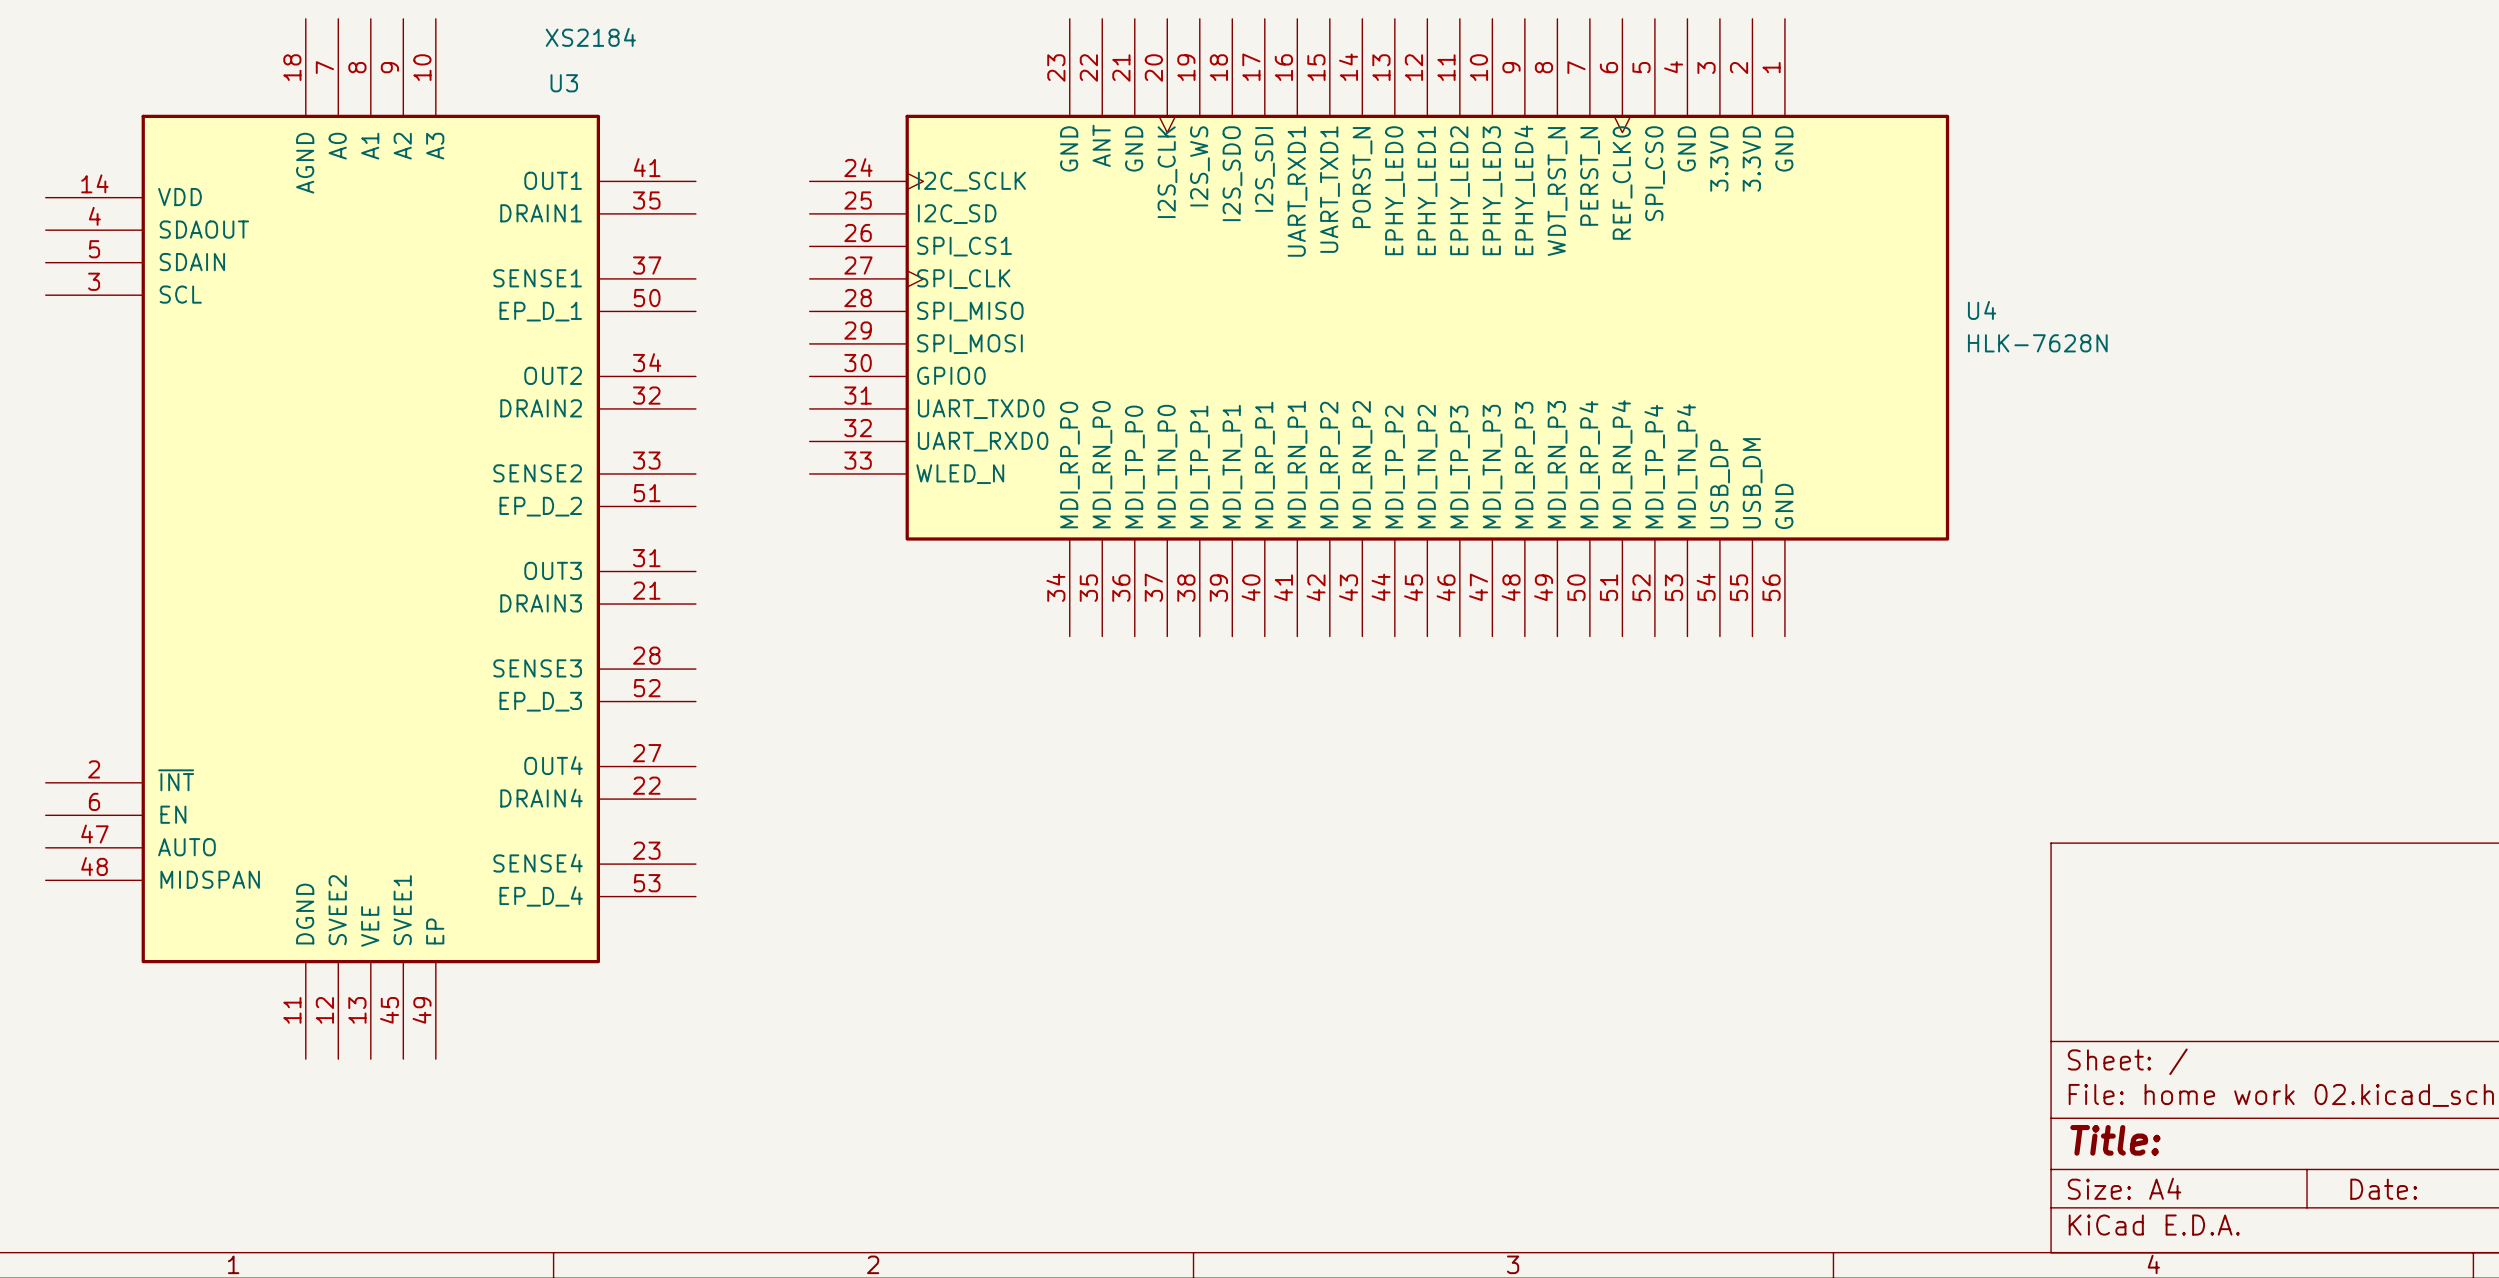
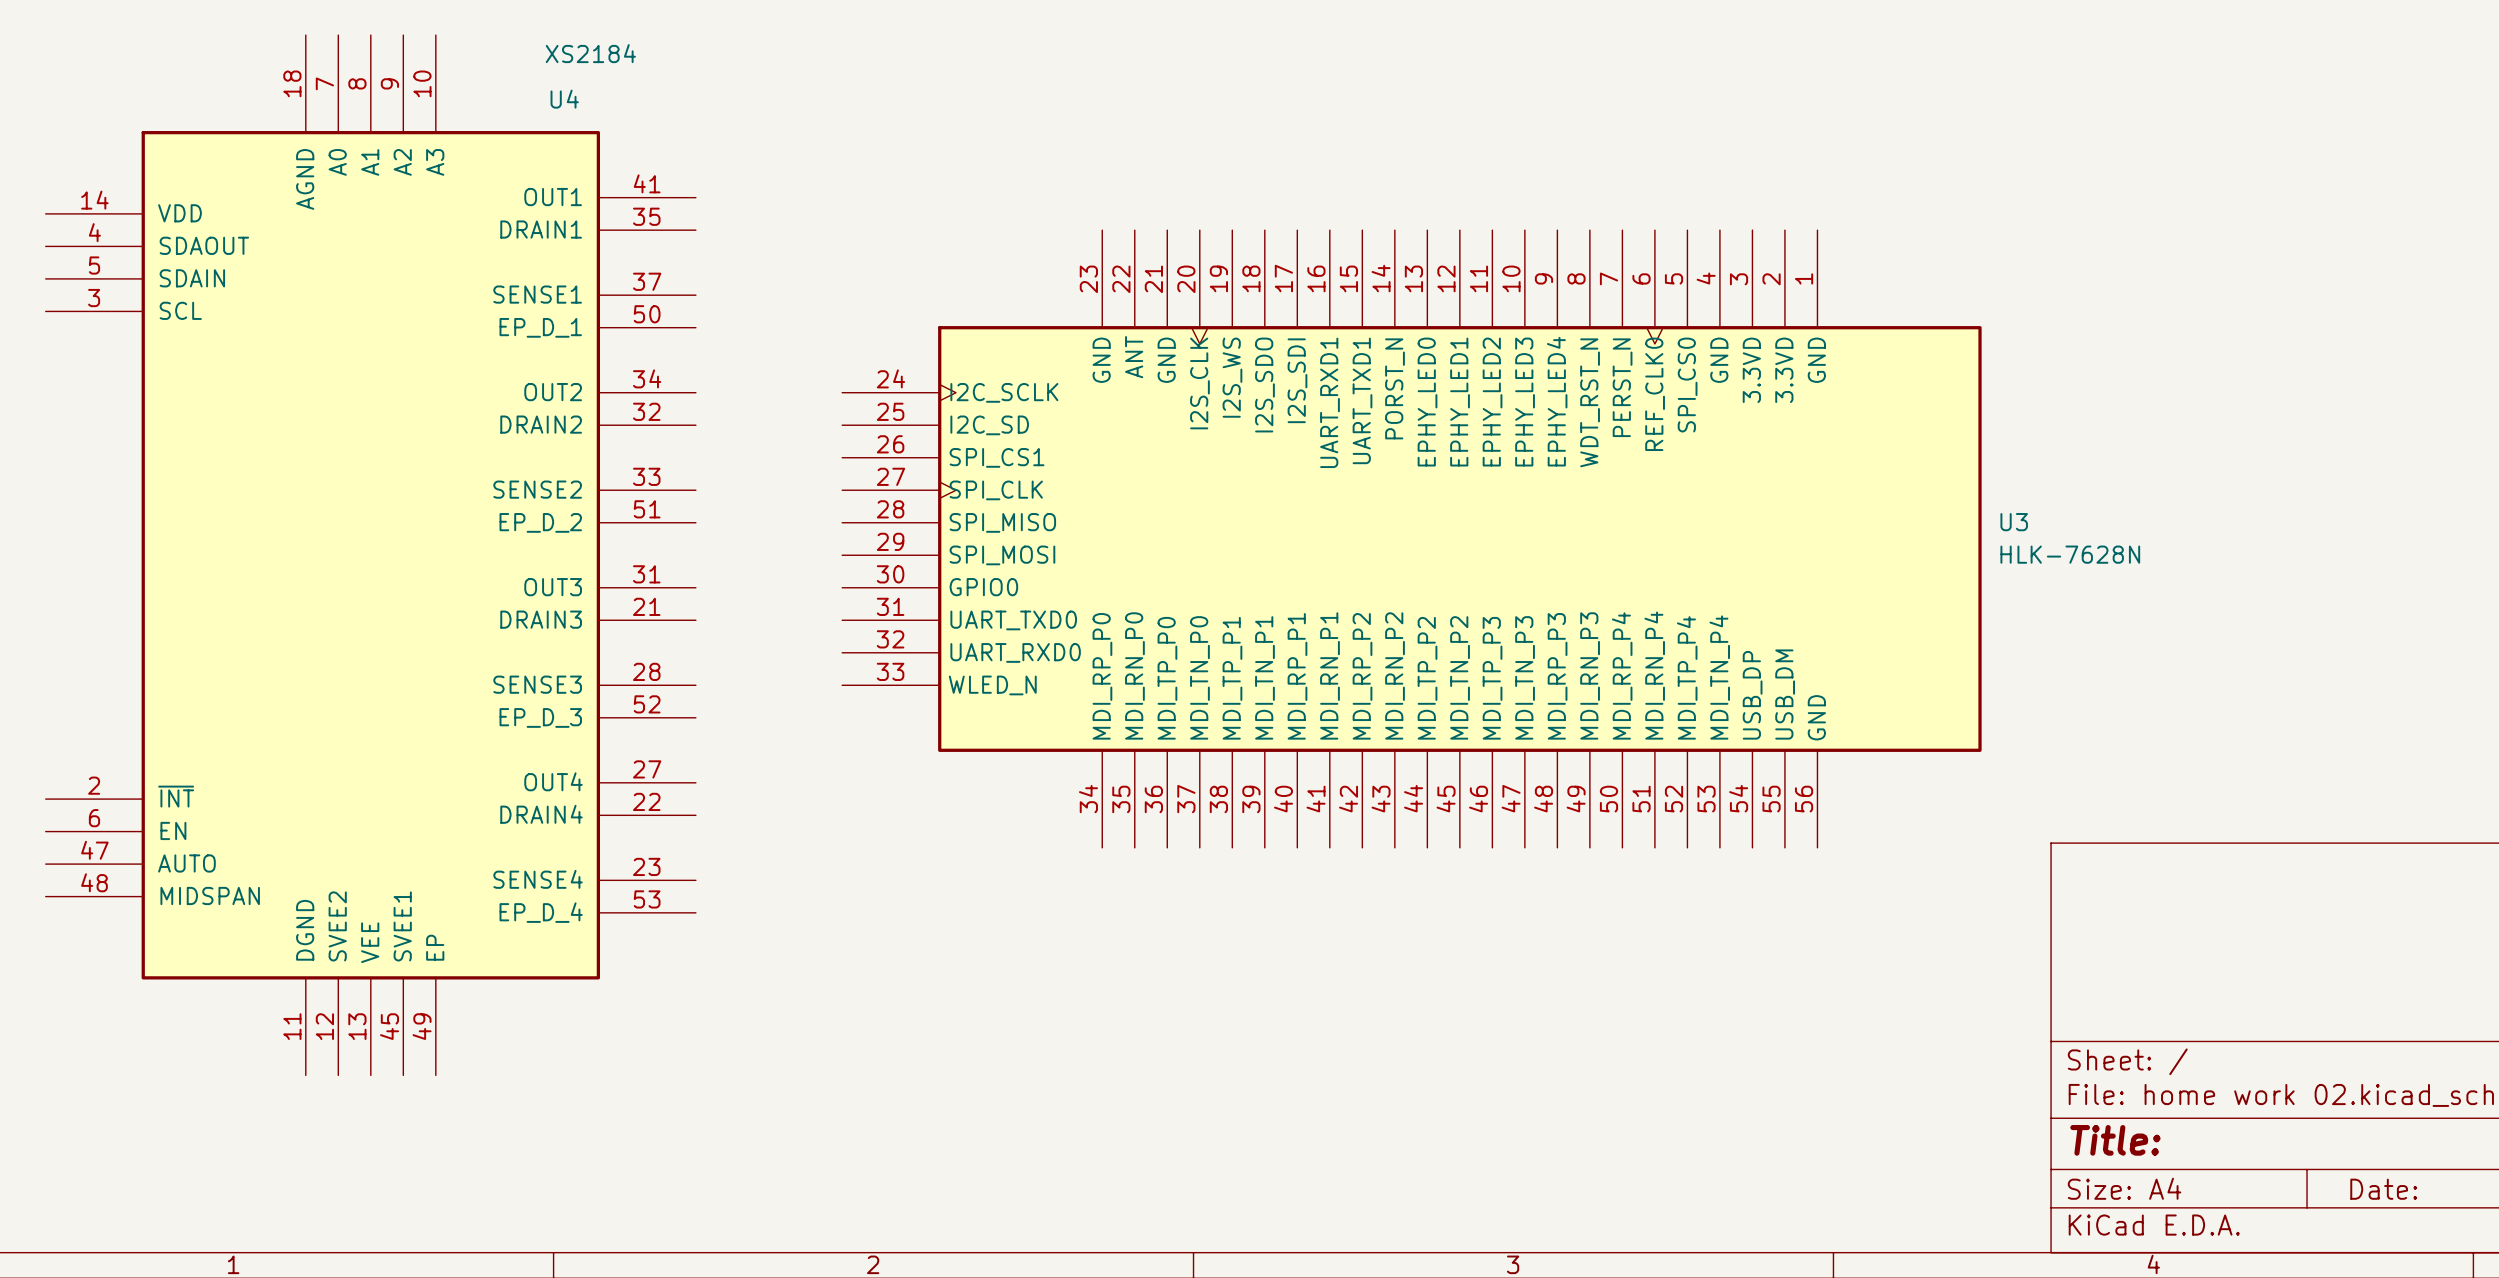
U3 symbol: [45, 18, 696, 1060] -> [842, 230, 1982, 848]
U4 symbol: [809, 18, 1950, 637] -> [45, 35, 696, 1076]
U3 value: XS2184 (590, 37) -> HLK-7628N (2070, 554)
U3 name position: U3 (564, 83) -> U3 (2014, 522)
U4 name position: U4 (1982, 310) -> U4 (564, 99)
U4 value: HLK-7628N (2037, 343) -> XS2184 (590, 53)

